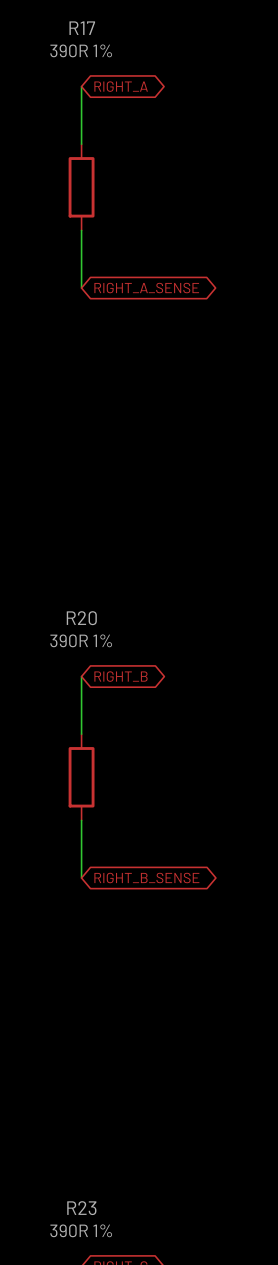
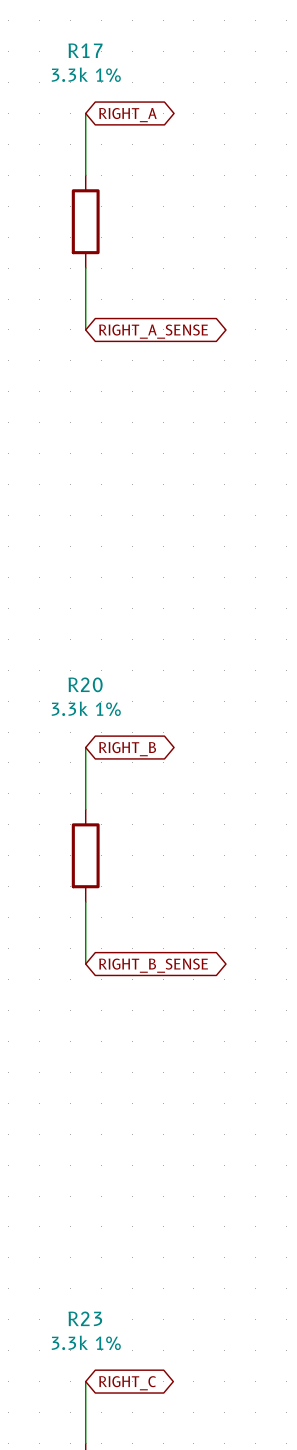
R17 value: 390R 1% (81, 50) -> 3.3k 1% (86, 74)
R20 value: 390R 1% (81, 640) -> 3.3k 1% (86, 708)
R23 value: 390R 1% (81, 1230) -> 3.3k 1% (86, 1342)

